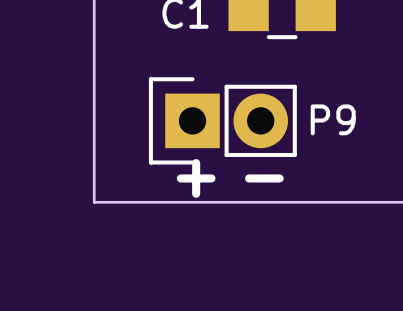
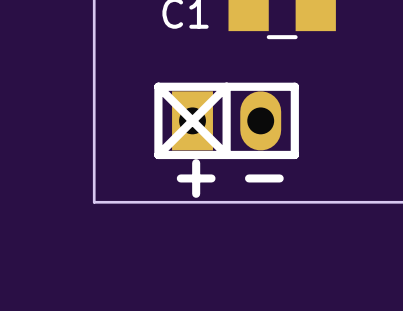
P9: (222, 120) -> none
part: none -> (226, 120)

